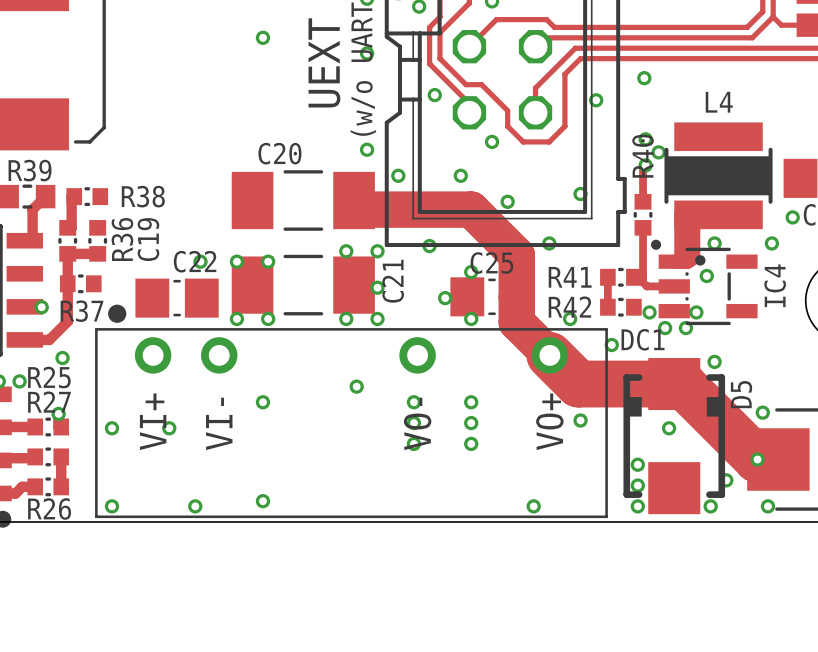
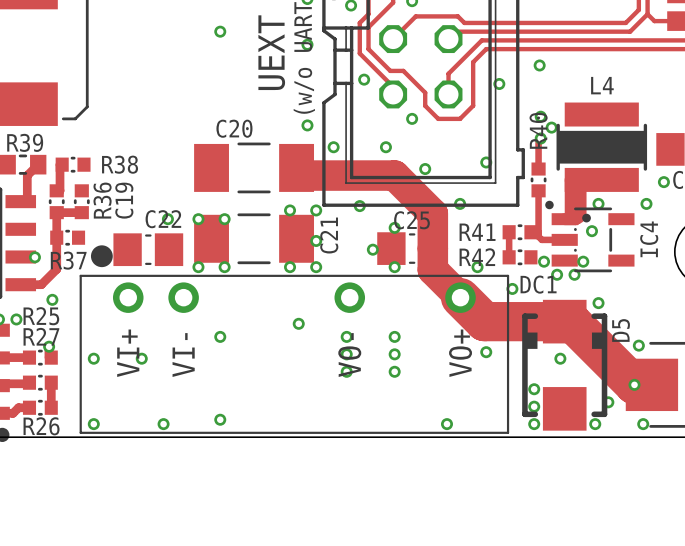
DC1 footprint: [95, 304, 608, 519] -> [79, 245, 510, 434]

